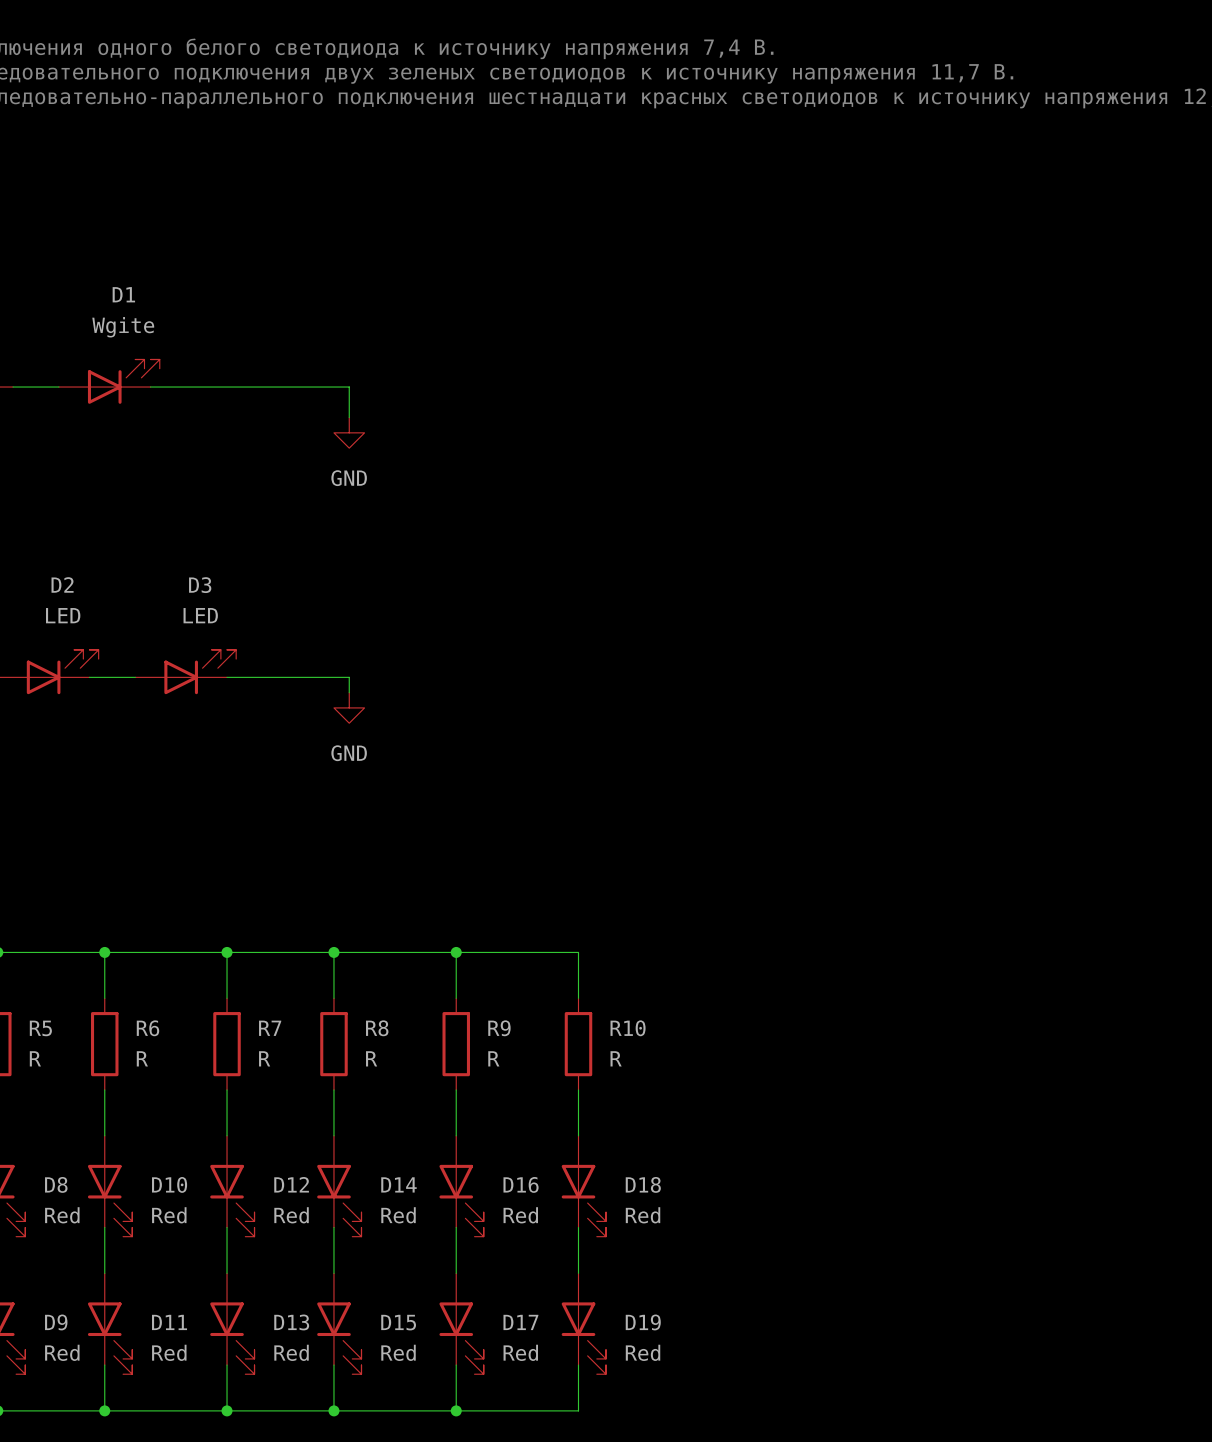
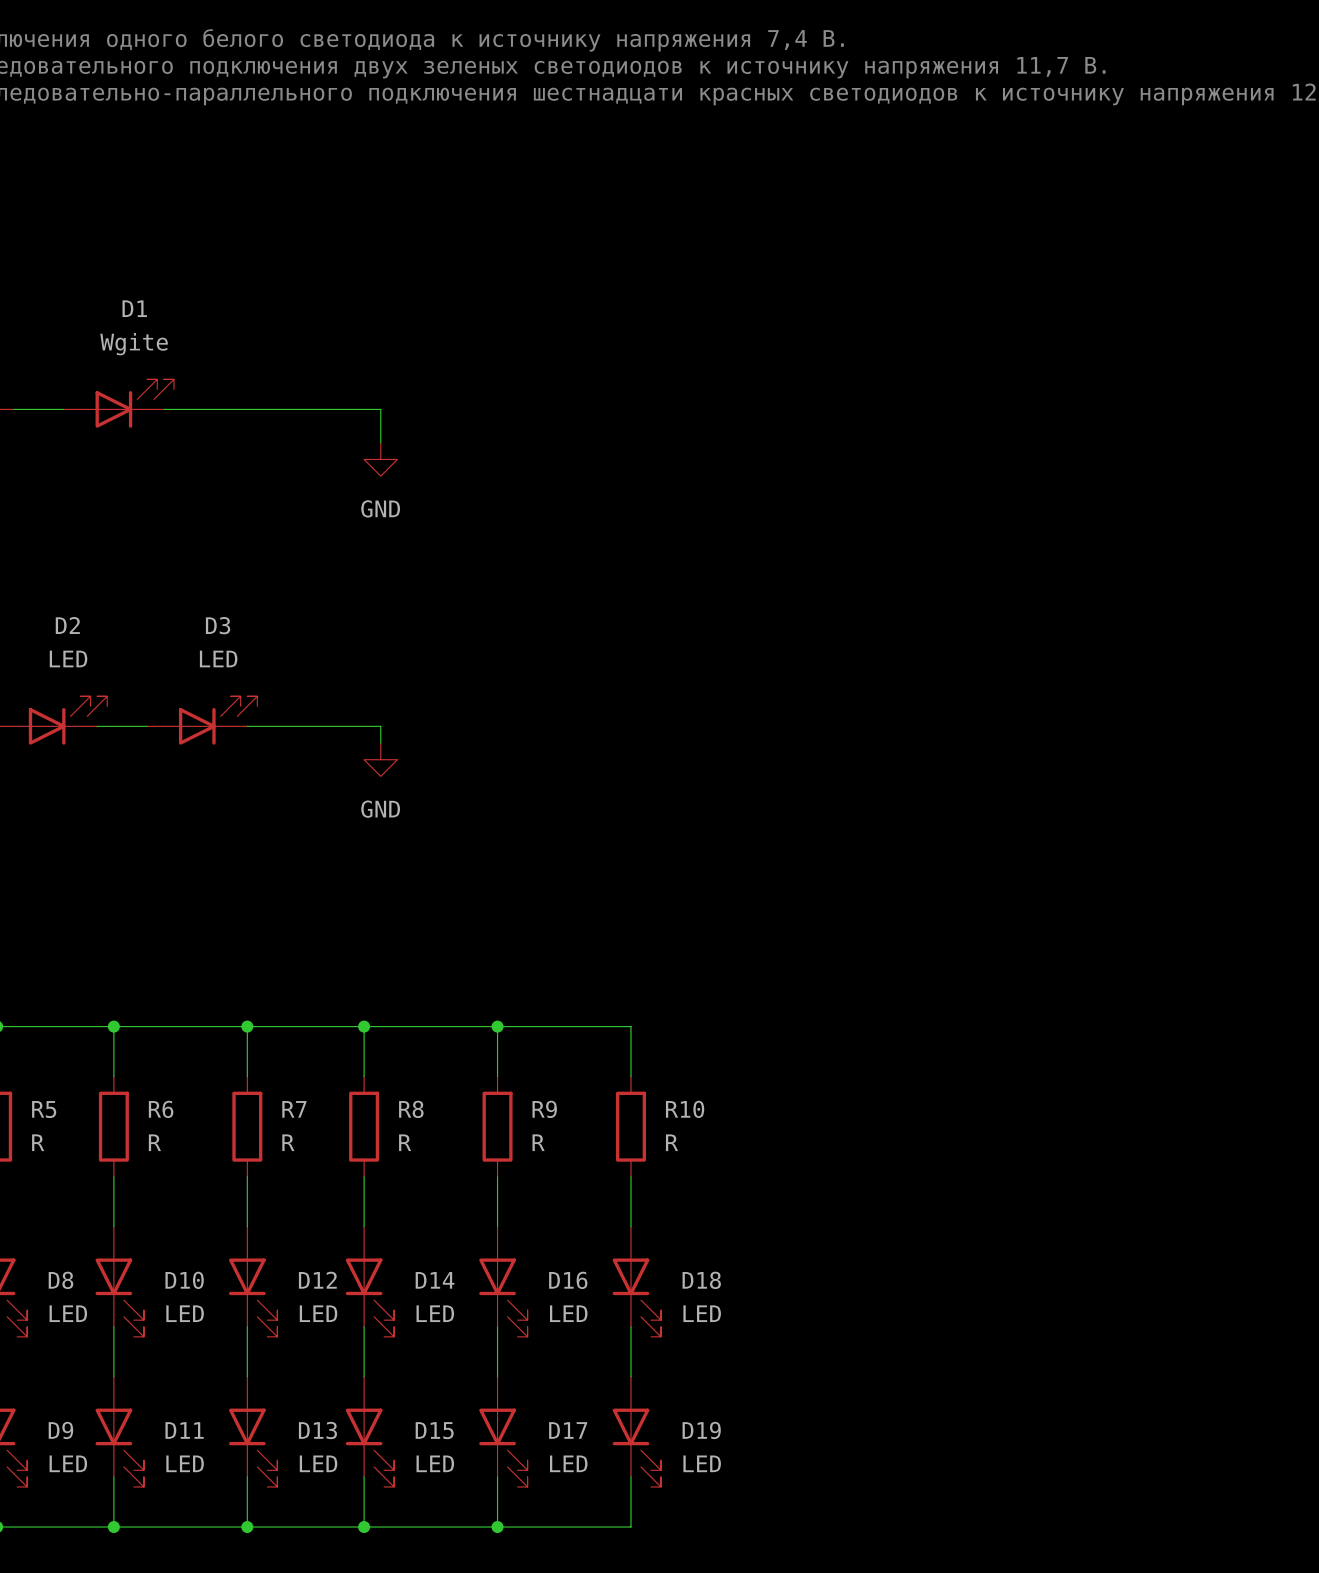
D8 value: Red (62, 1215) -> LED (68, 1313)
D10 value: Red (169, 1215) -> LED (185, 1313)
D12 value: Red (291, 1215) -> LED (318, 1313)
D14 value: Red (398, 1215) -> LED (435, 1313)
D16 value: Red (520, 1215) -> LED (568, 1313)
D18 value: Red (643, 1215) -> LED (702, 1313)
D9 value: Red (62, 1352) -> LED (68, 1463)
D11 value: Red (169, 1352) -> LED (185, 1463)
D13 value: Red (291, 1352) -> LED (318, 1463)
D15 value: Red (398, 1352) -> LED (435, 1463)
D17 value: Red (520, 1352) -> LED (568, 1463)
D19 value: Red (643, 1352) -> LED (702, 1463)

